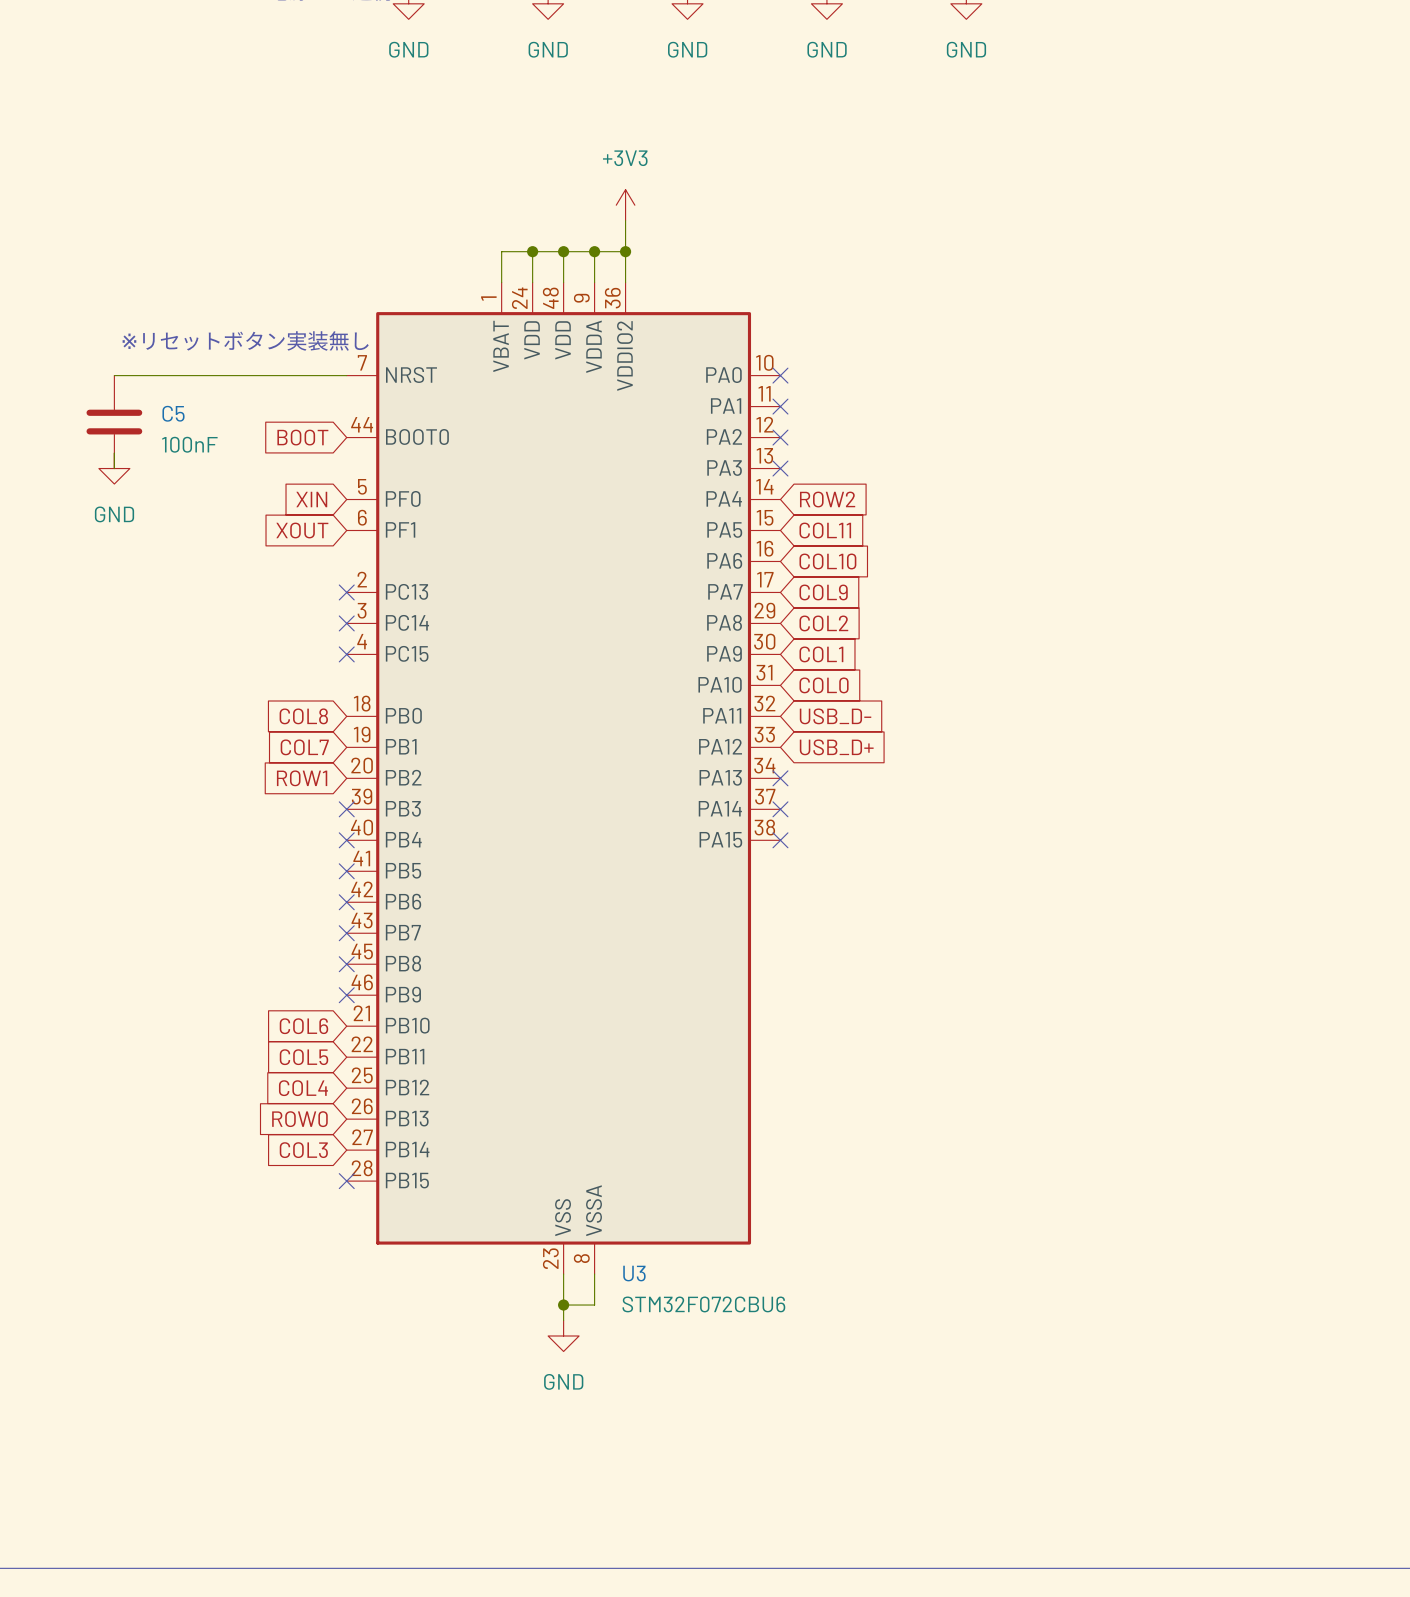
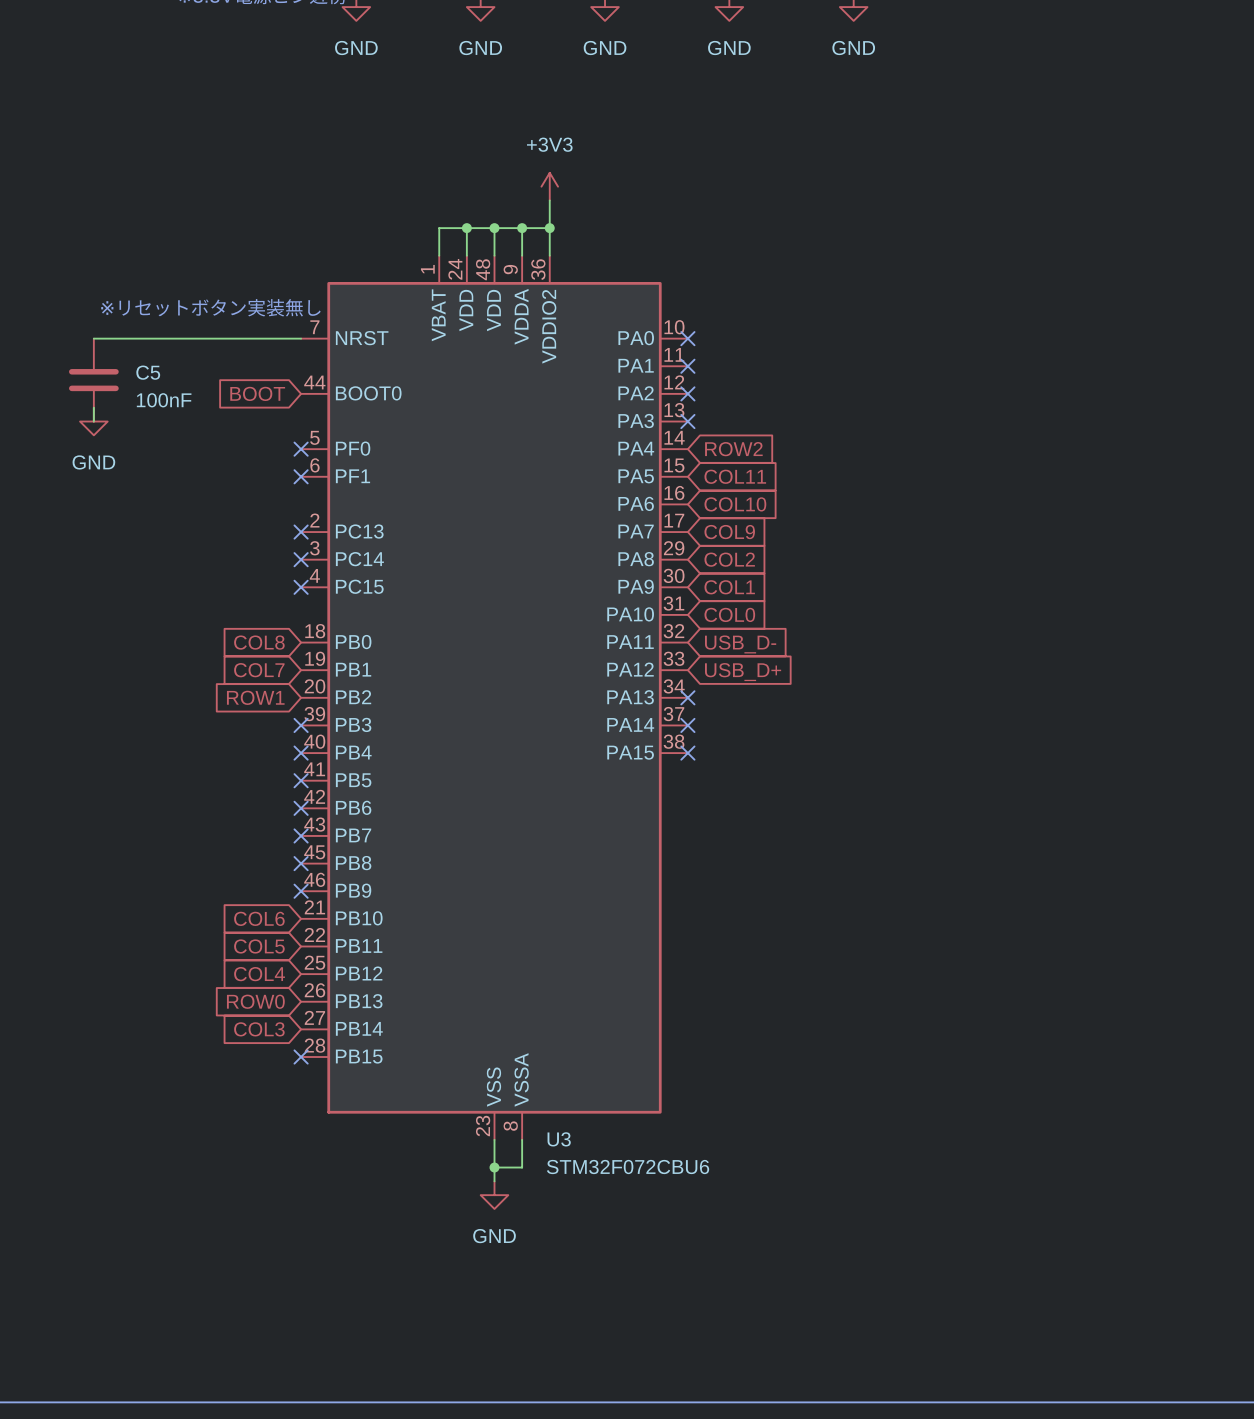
global label: XIN (311, 499) -> none
no-connect mark: none -> (301, 449)
global label: XOUT (302, 530) -> none
no-connect mark: none -> (301, 476)

